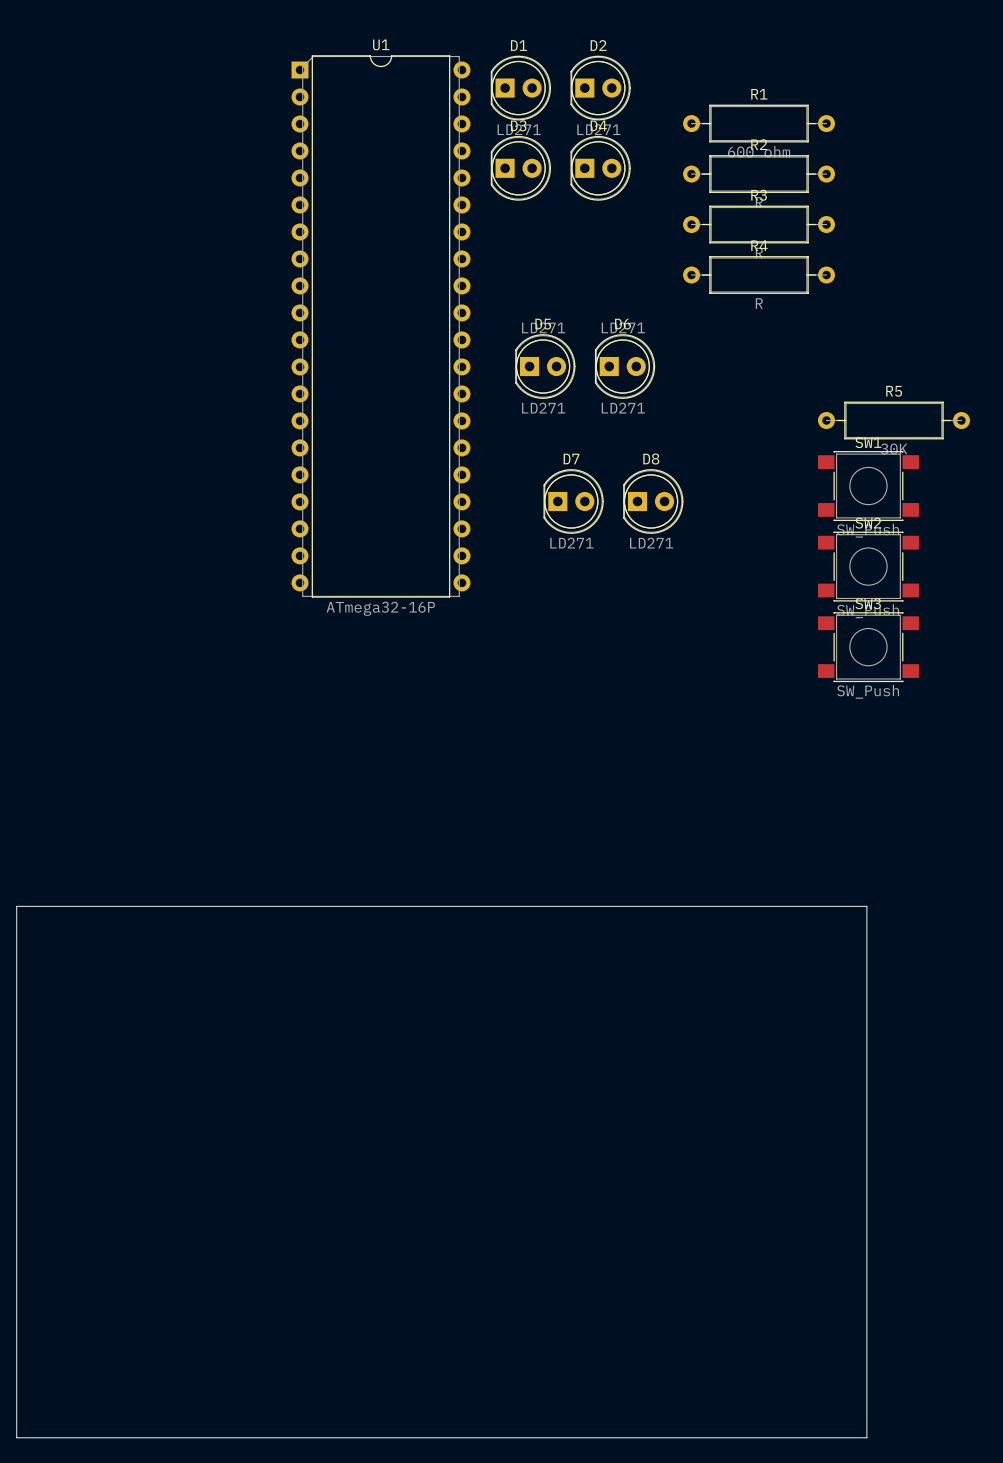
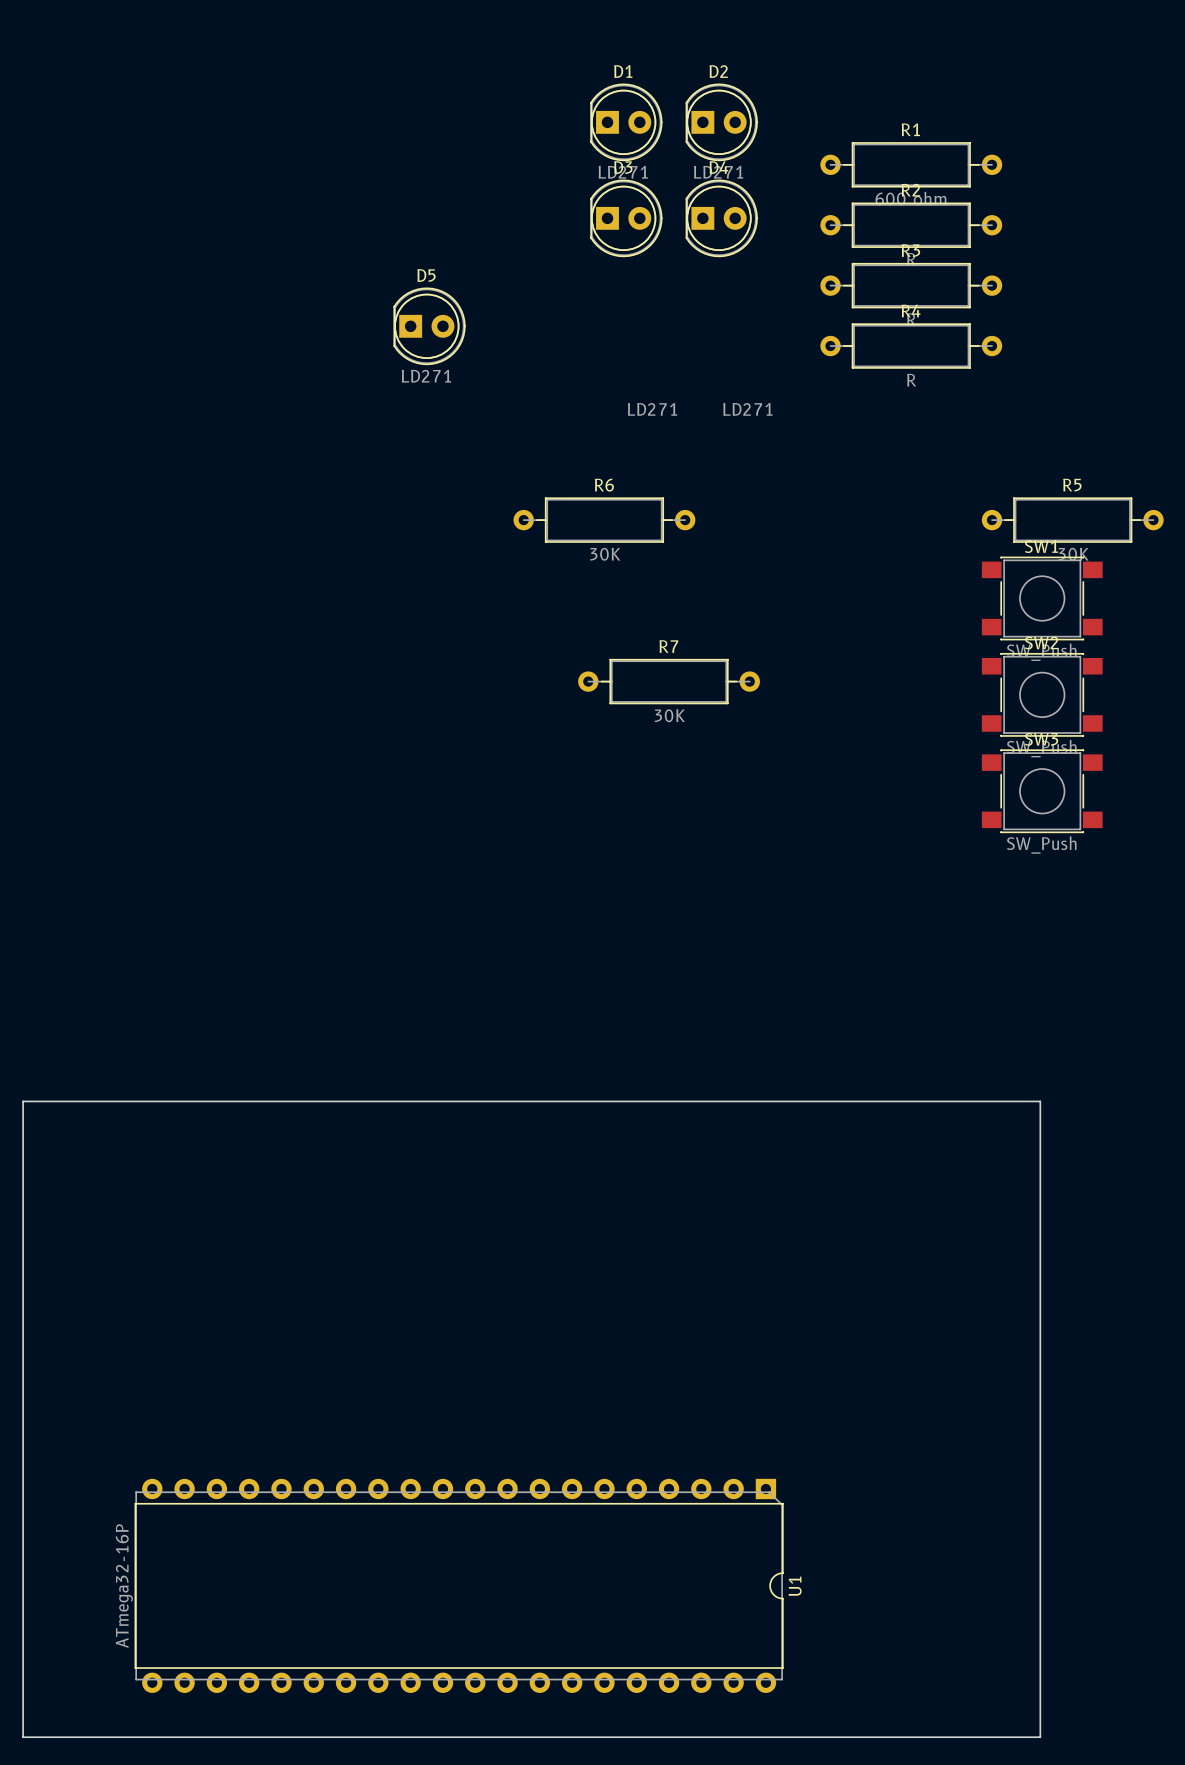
U1 rotation: 0° (380, 326) -> 90° clockwise (459, 1585)
U1 position: (380, 326) -> (459, 1585)
D5 position: (545, 366) -> (429, 326)
D6: LD271 (625, 366) -> none
R6: none -> 30K (604, 520)
D7: LD271 (573, 501) -> none
D8: LD271 (653, 501) -> none
R7: none -> 30K (669, 681)

